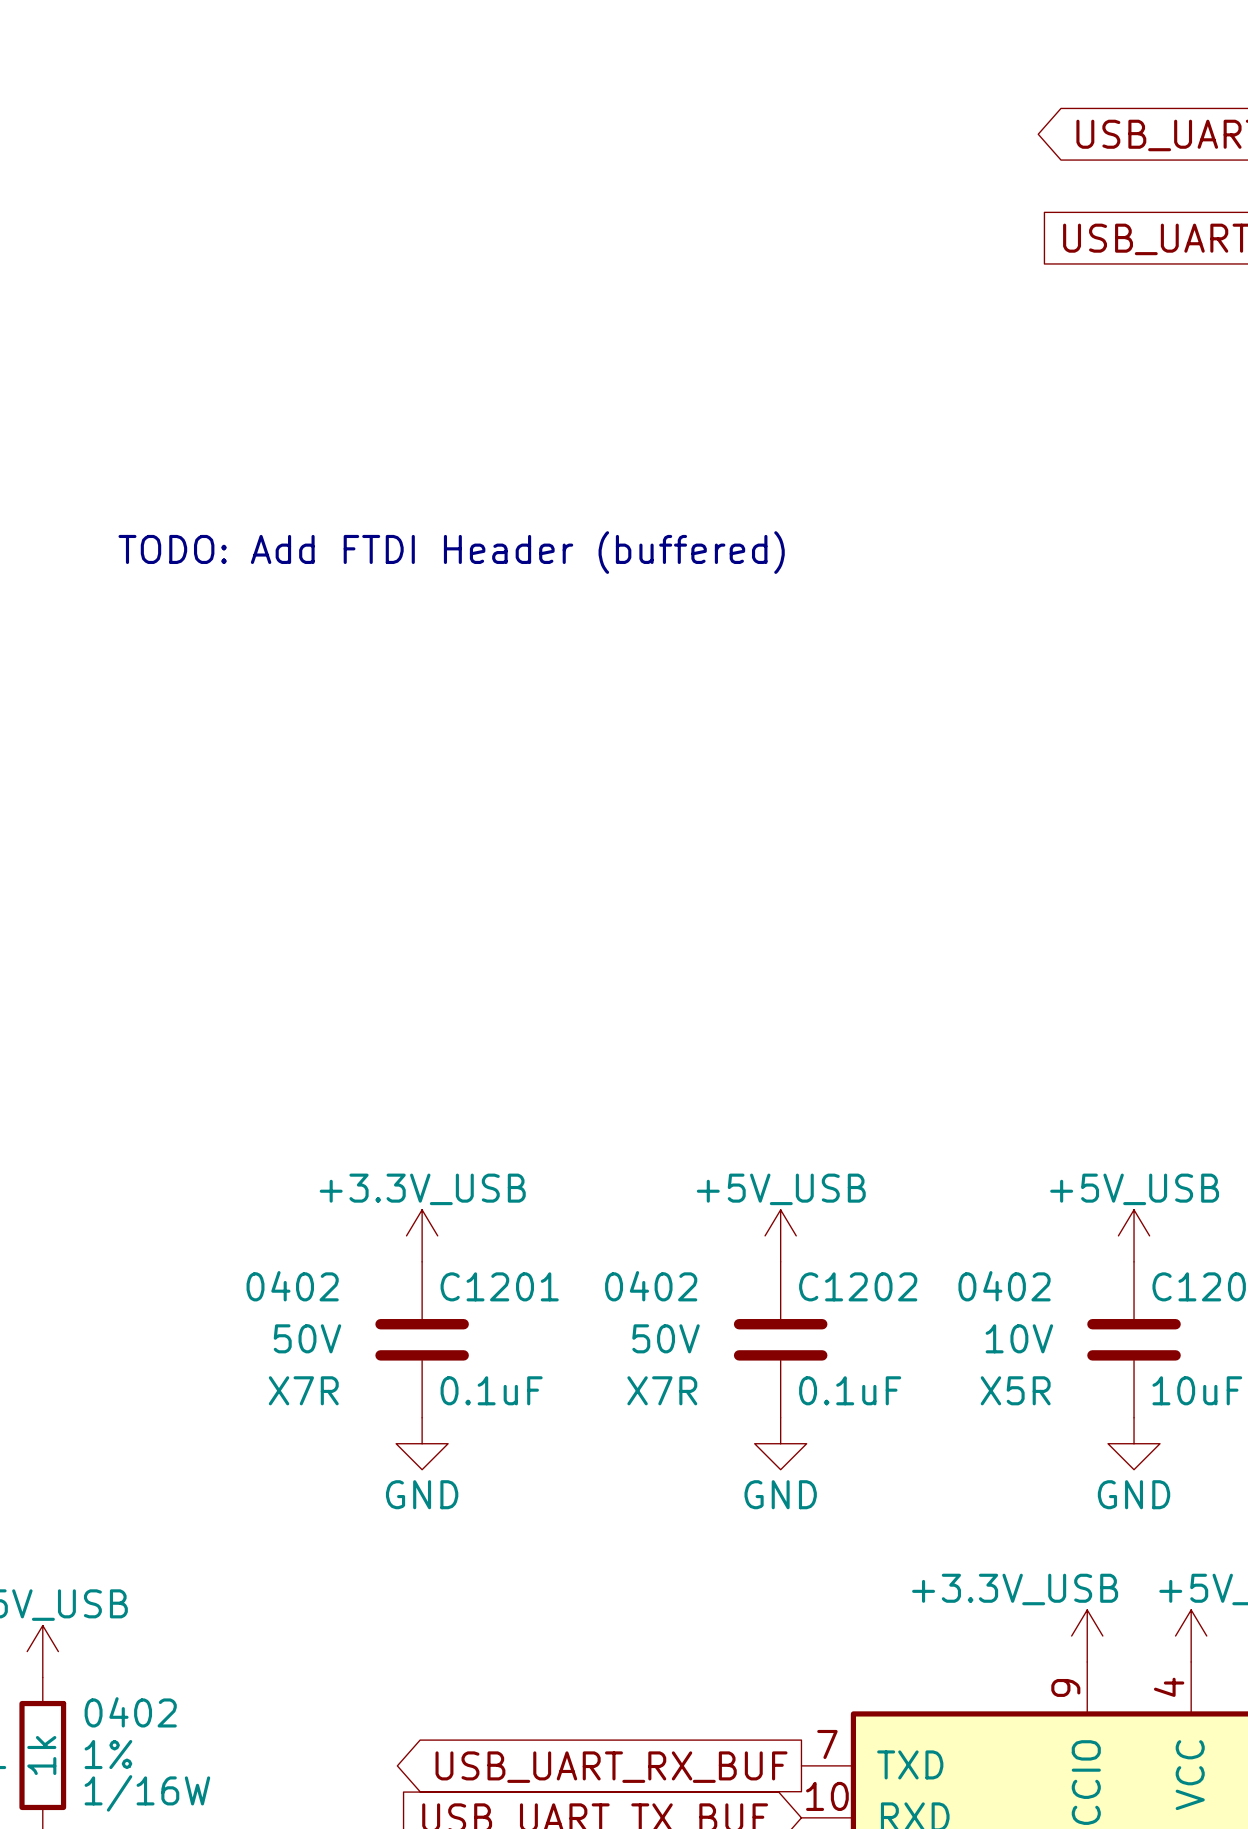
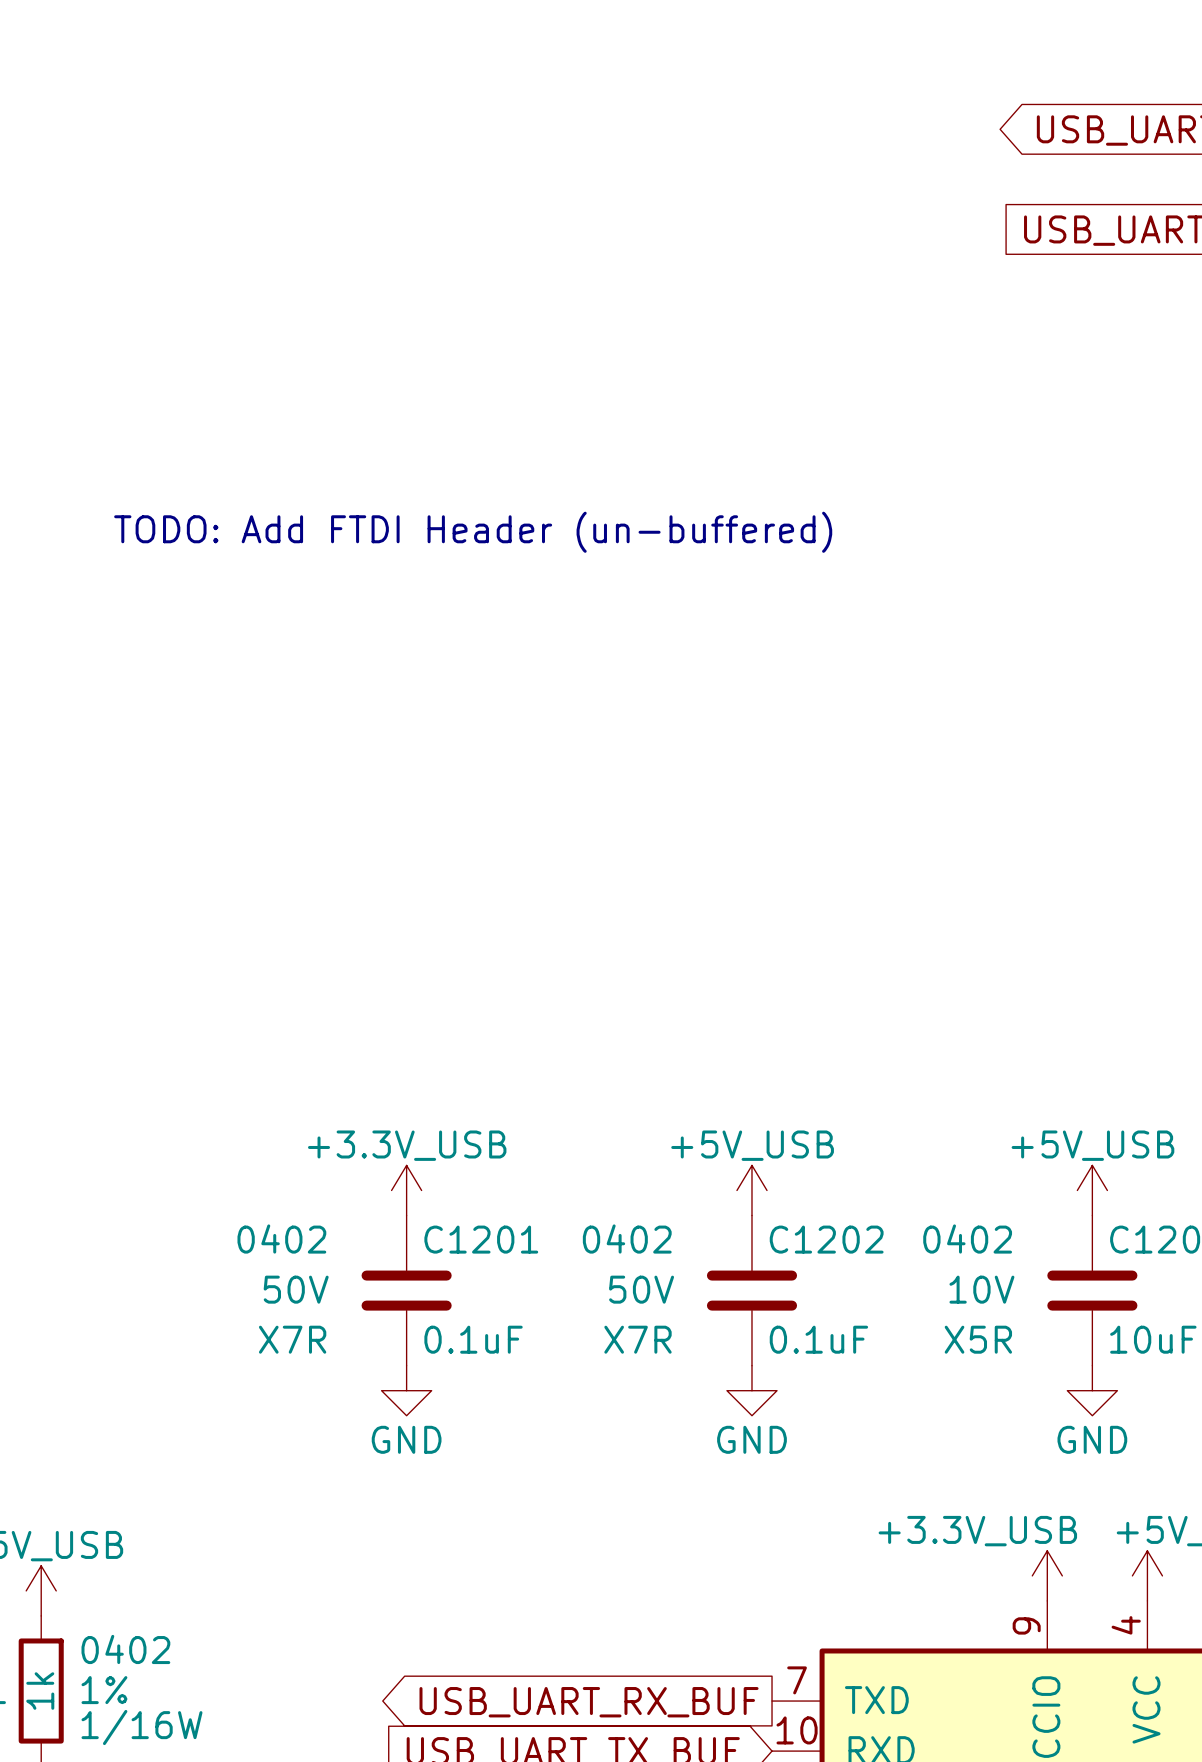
text: TODO: Add FTDI Header (buffered) (451, 552) -> TODO: Add FTDI Header (un-buffered) (473, 532)

